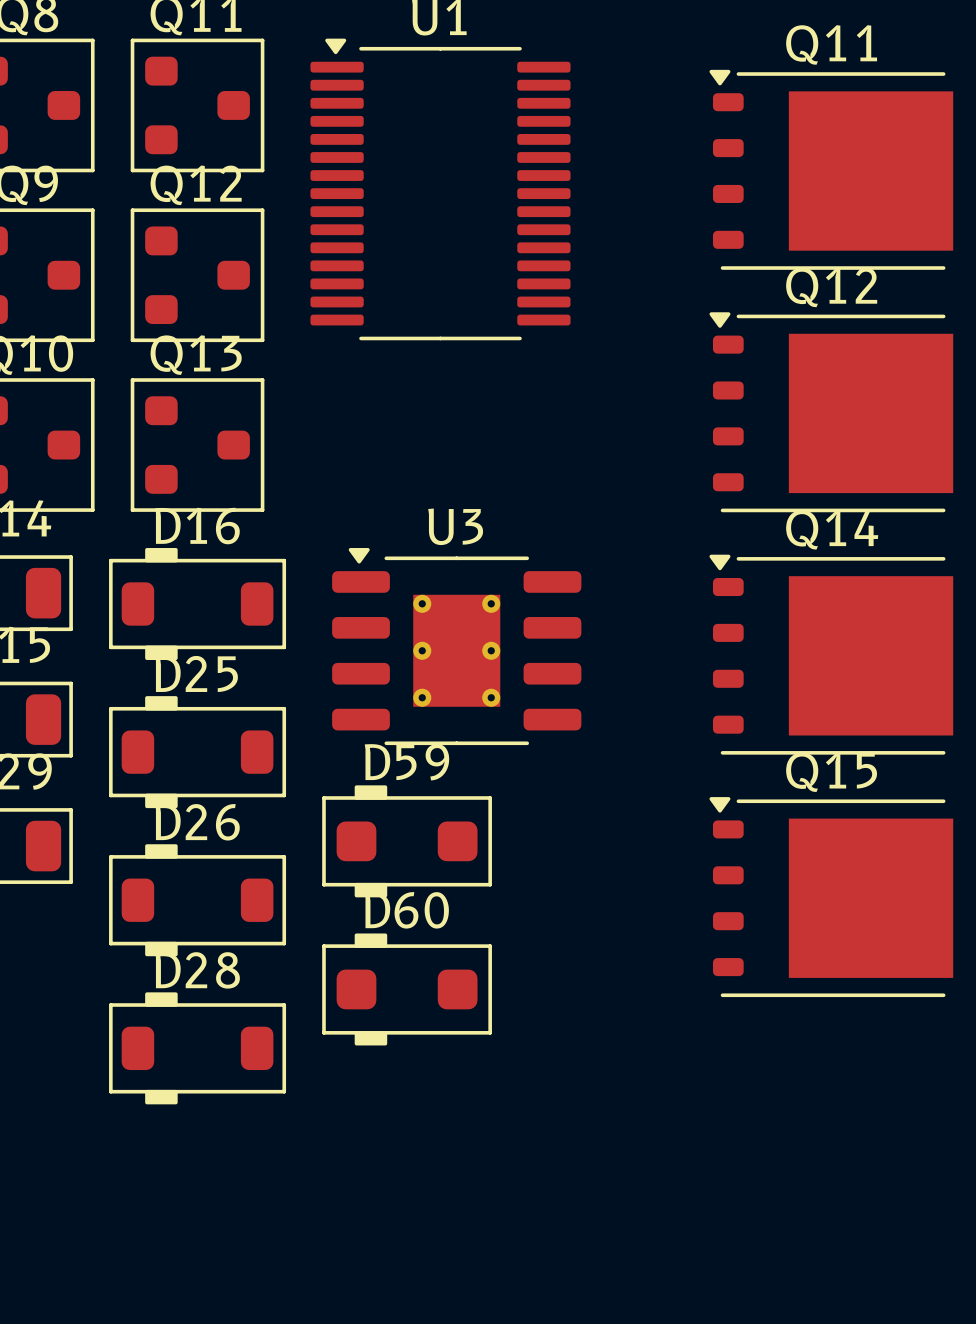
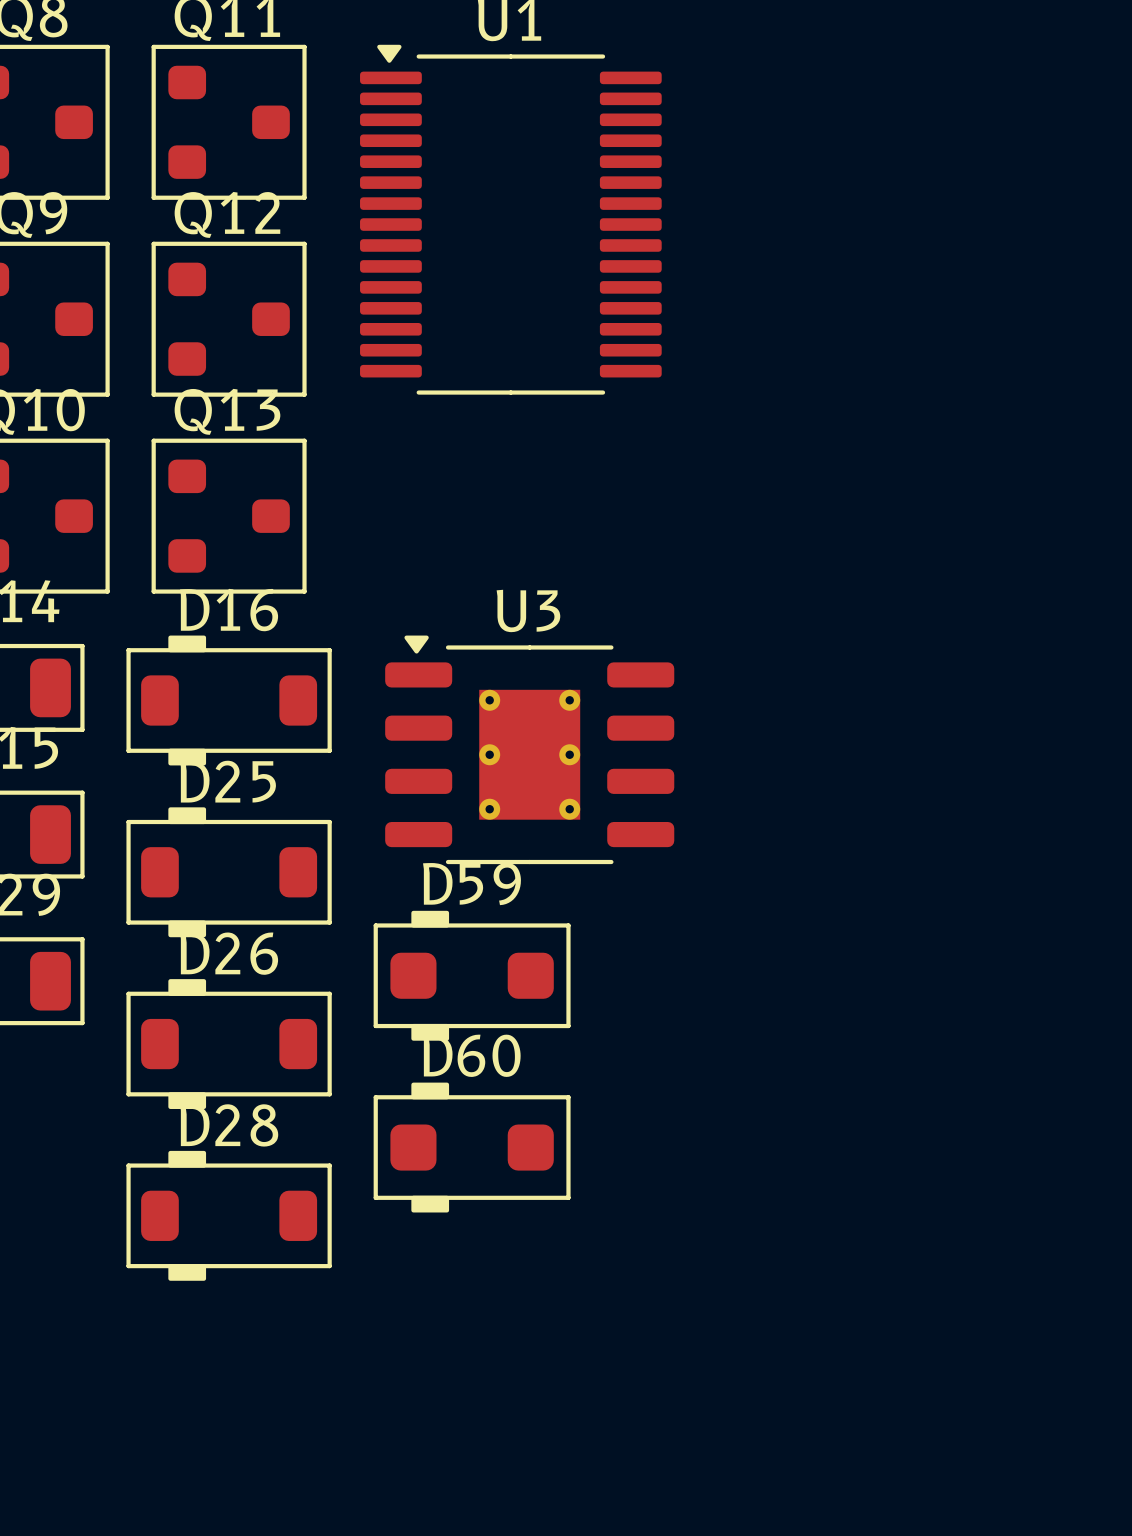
Q11: (831, 169) -> none
Q12: (831, 412) -> none
Q14: (831, 654) -> none
Q15: (831, 897) -> none

